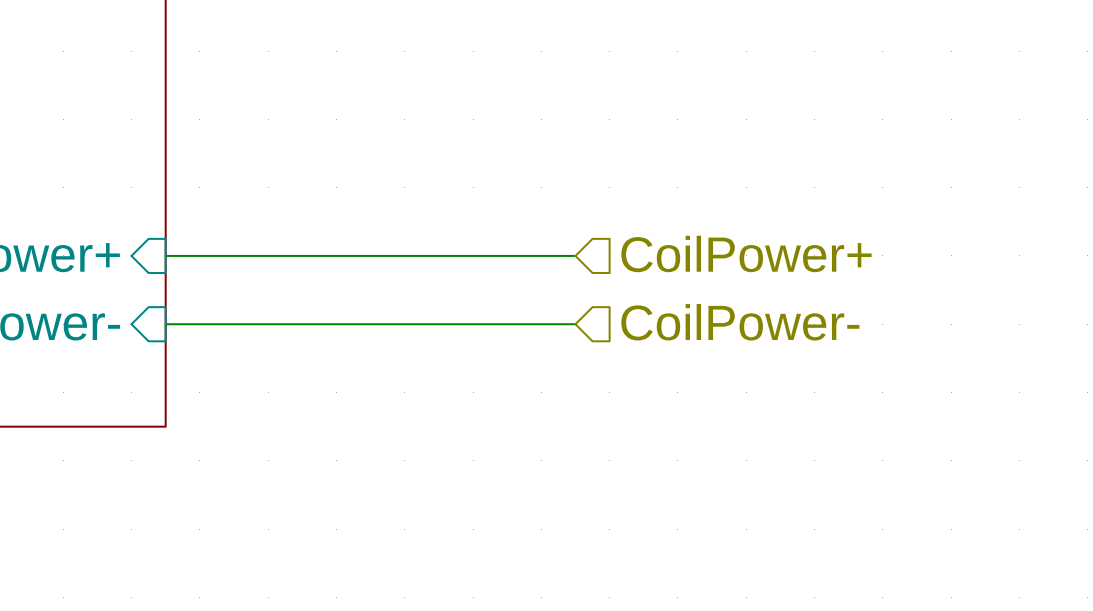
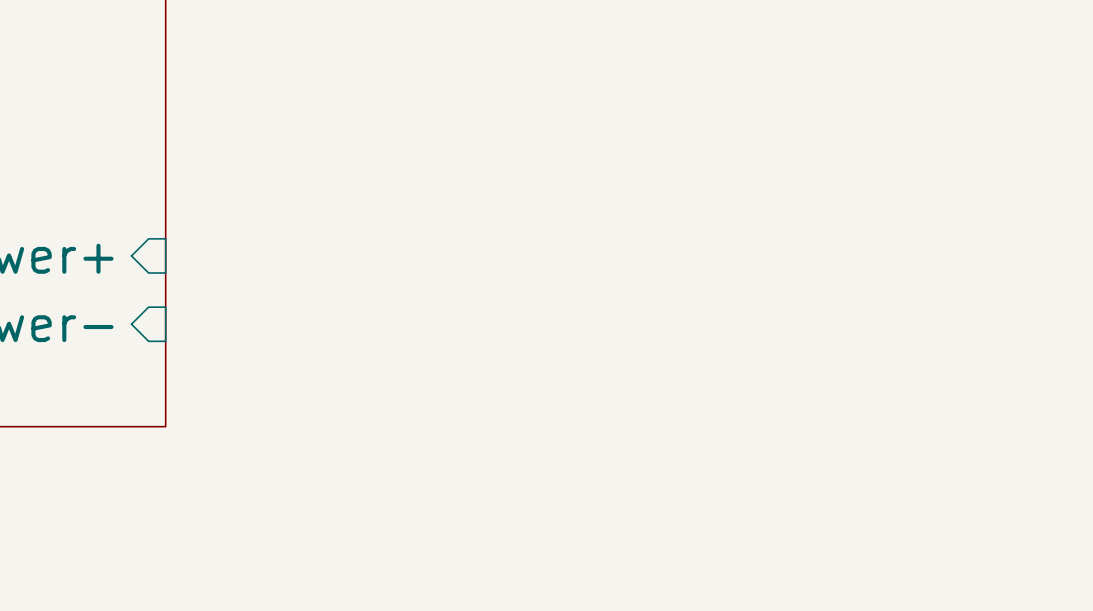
hierarchical label: CoilPower+ (746, 253) -> none
wire: (165, 255) (575, 255) -> none
hierarchical label: CoilPower- (740, 322) -> none
wire: (165, 324) (575, 324) -> none

